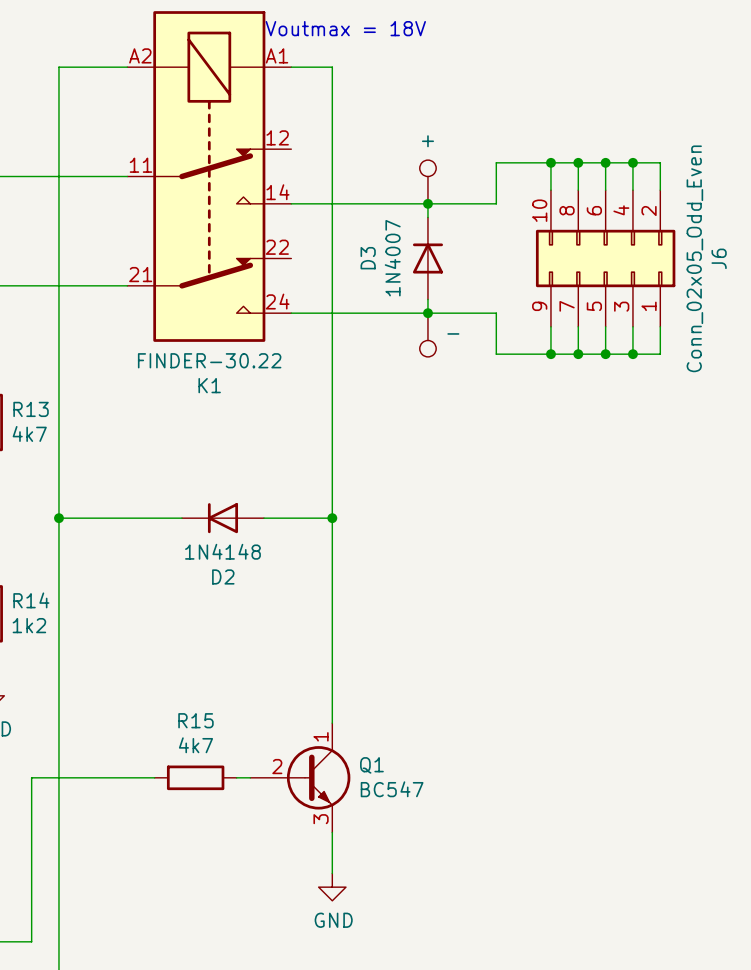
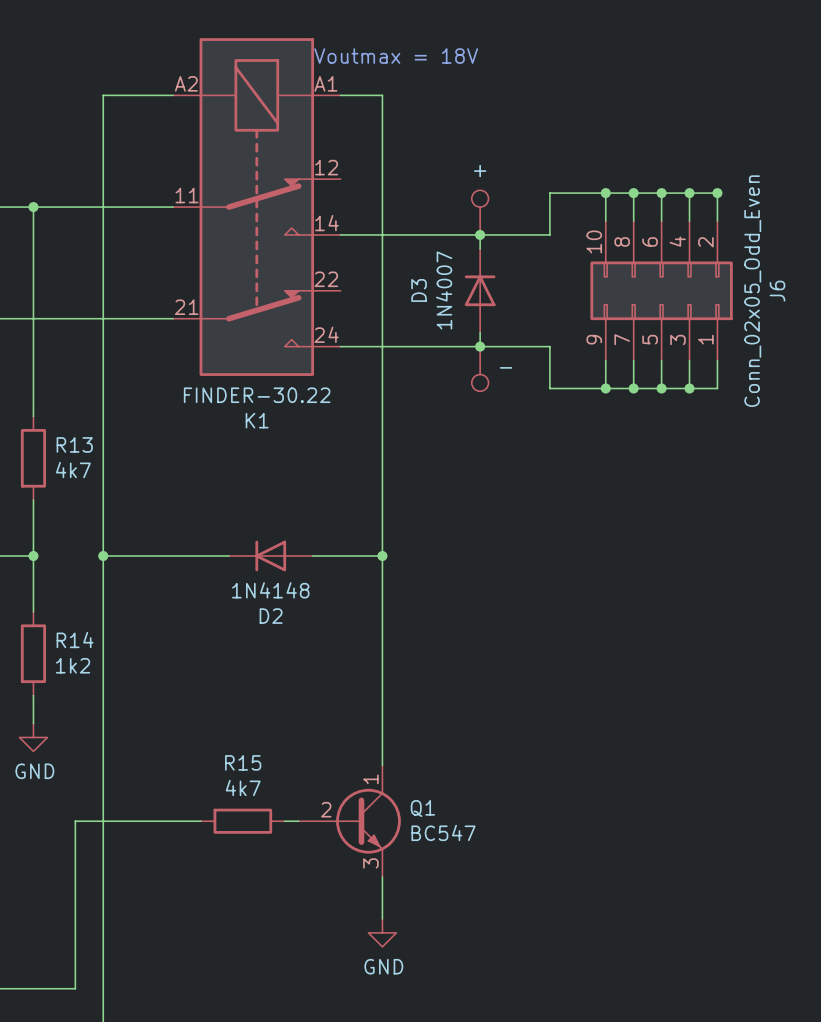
junction: none -> (717, 193)

